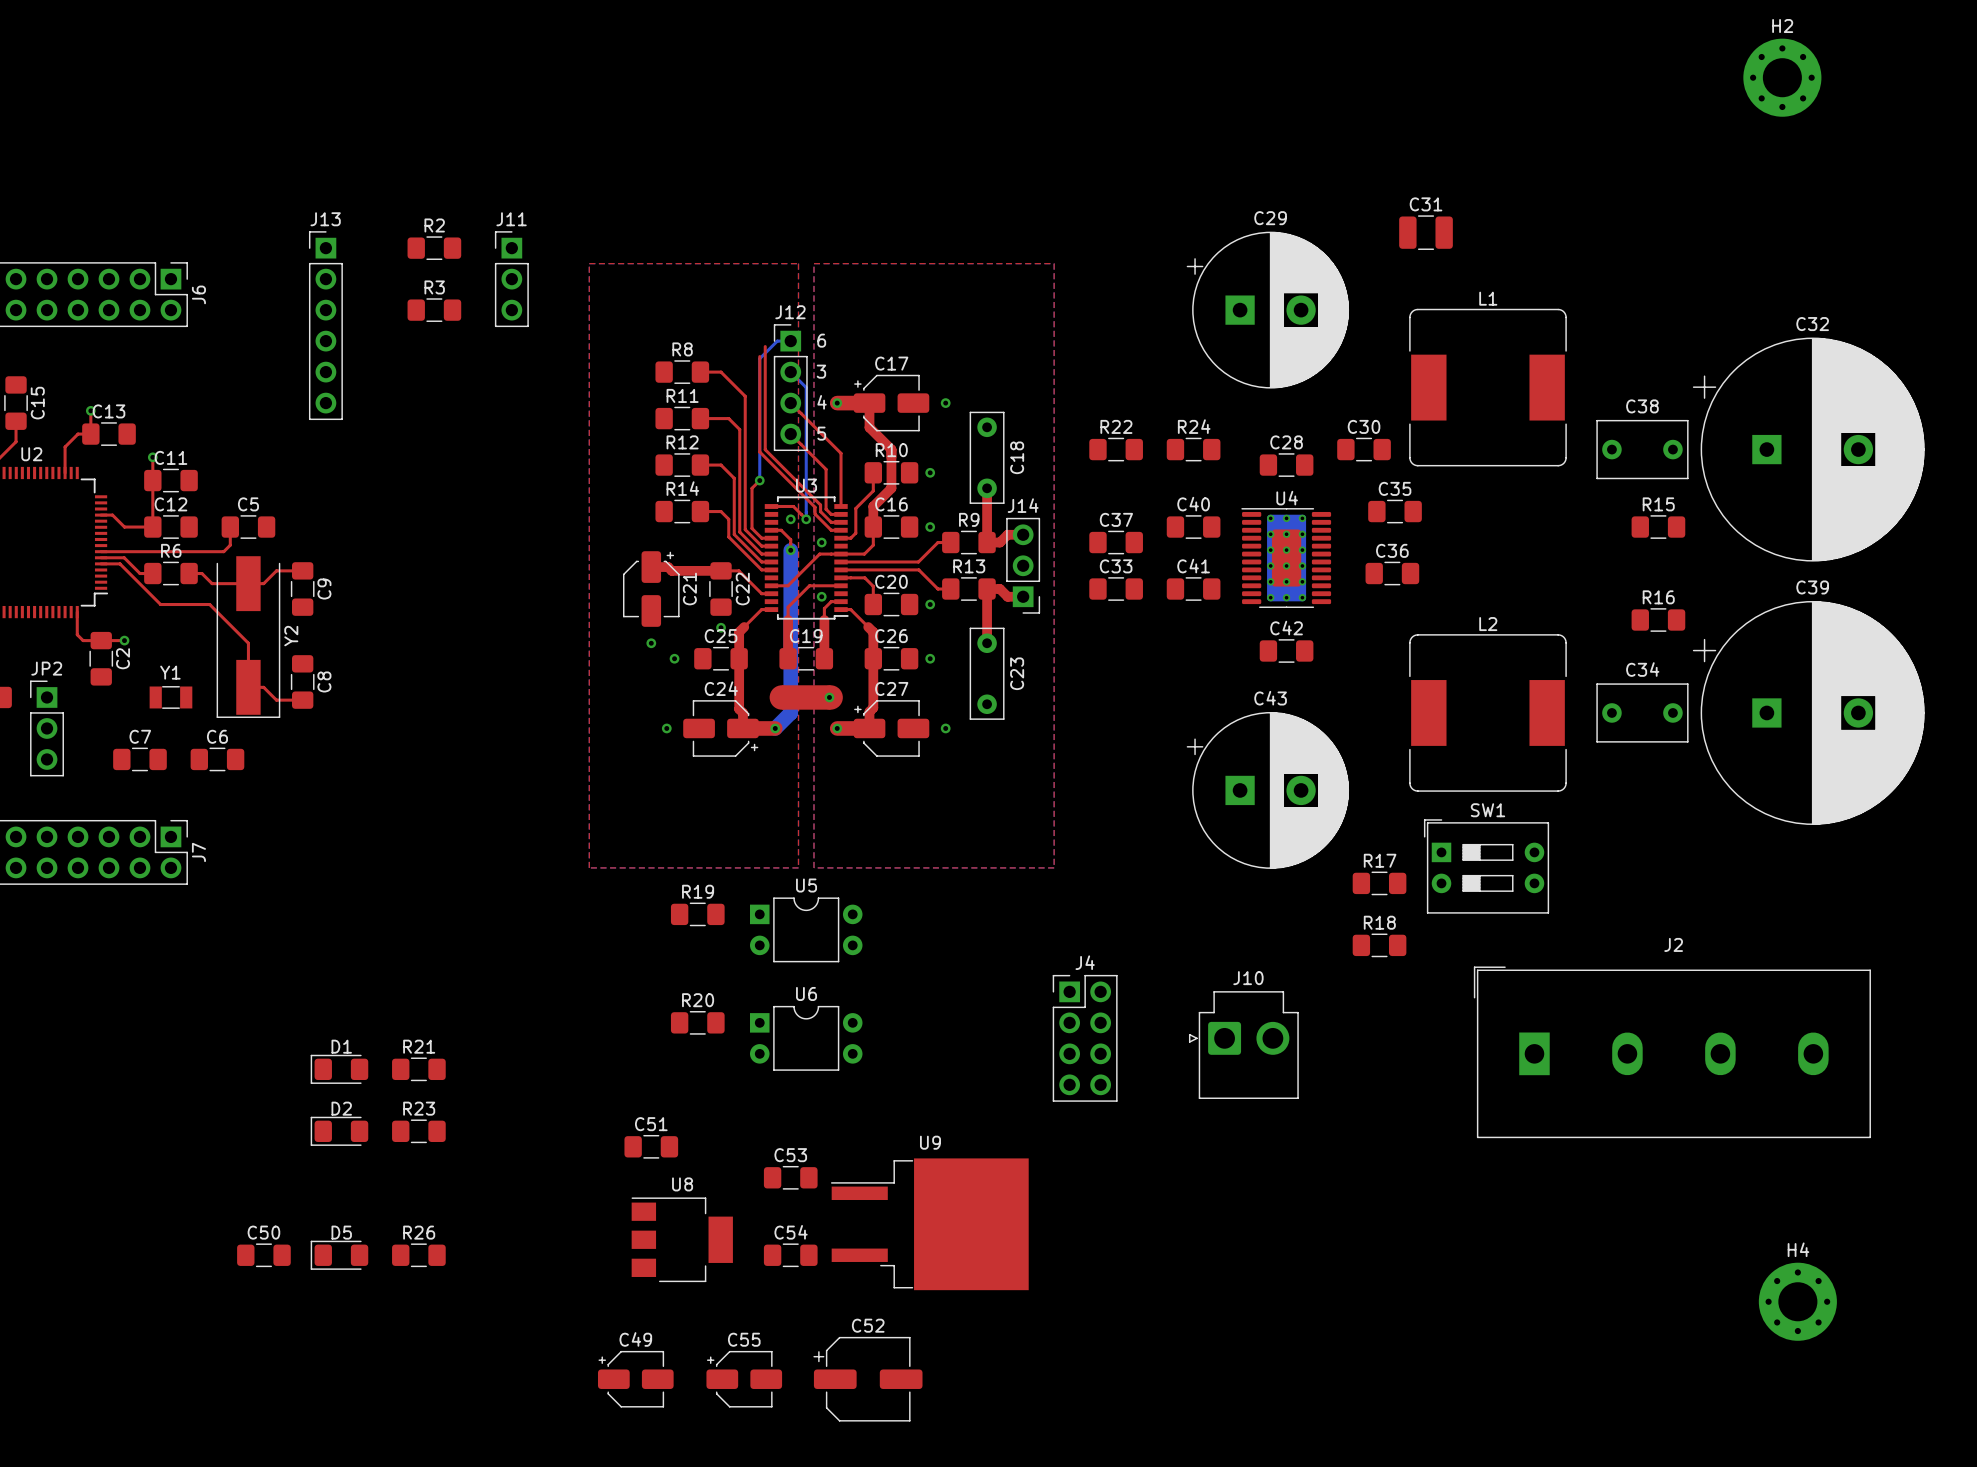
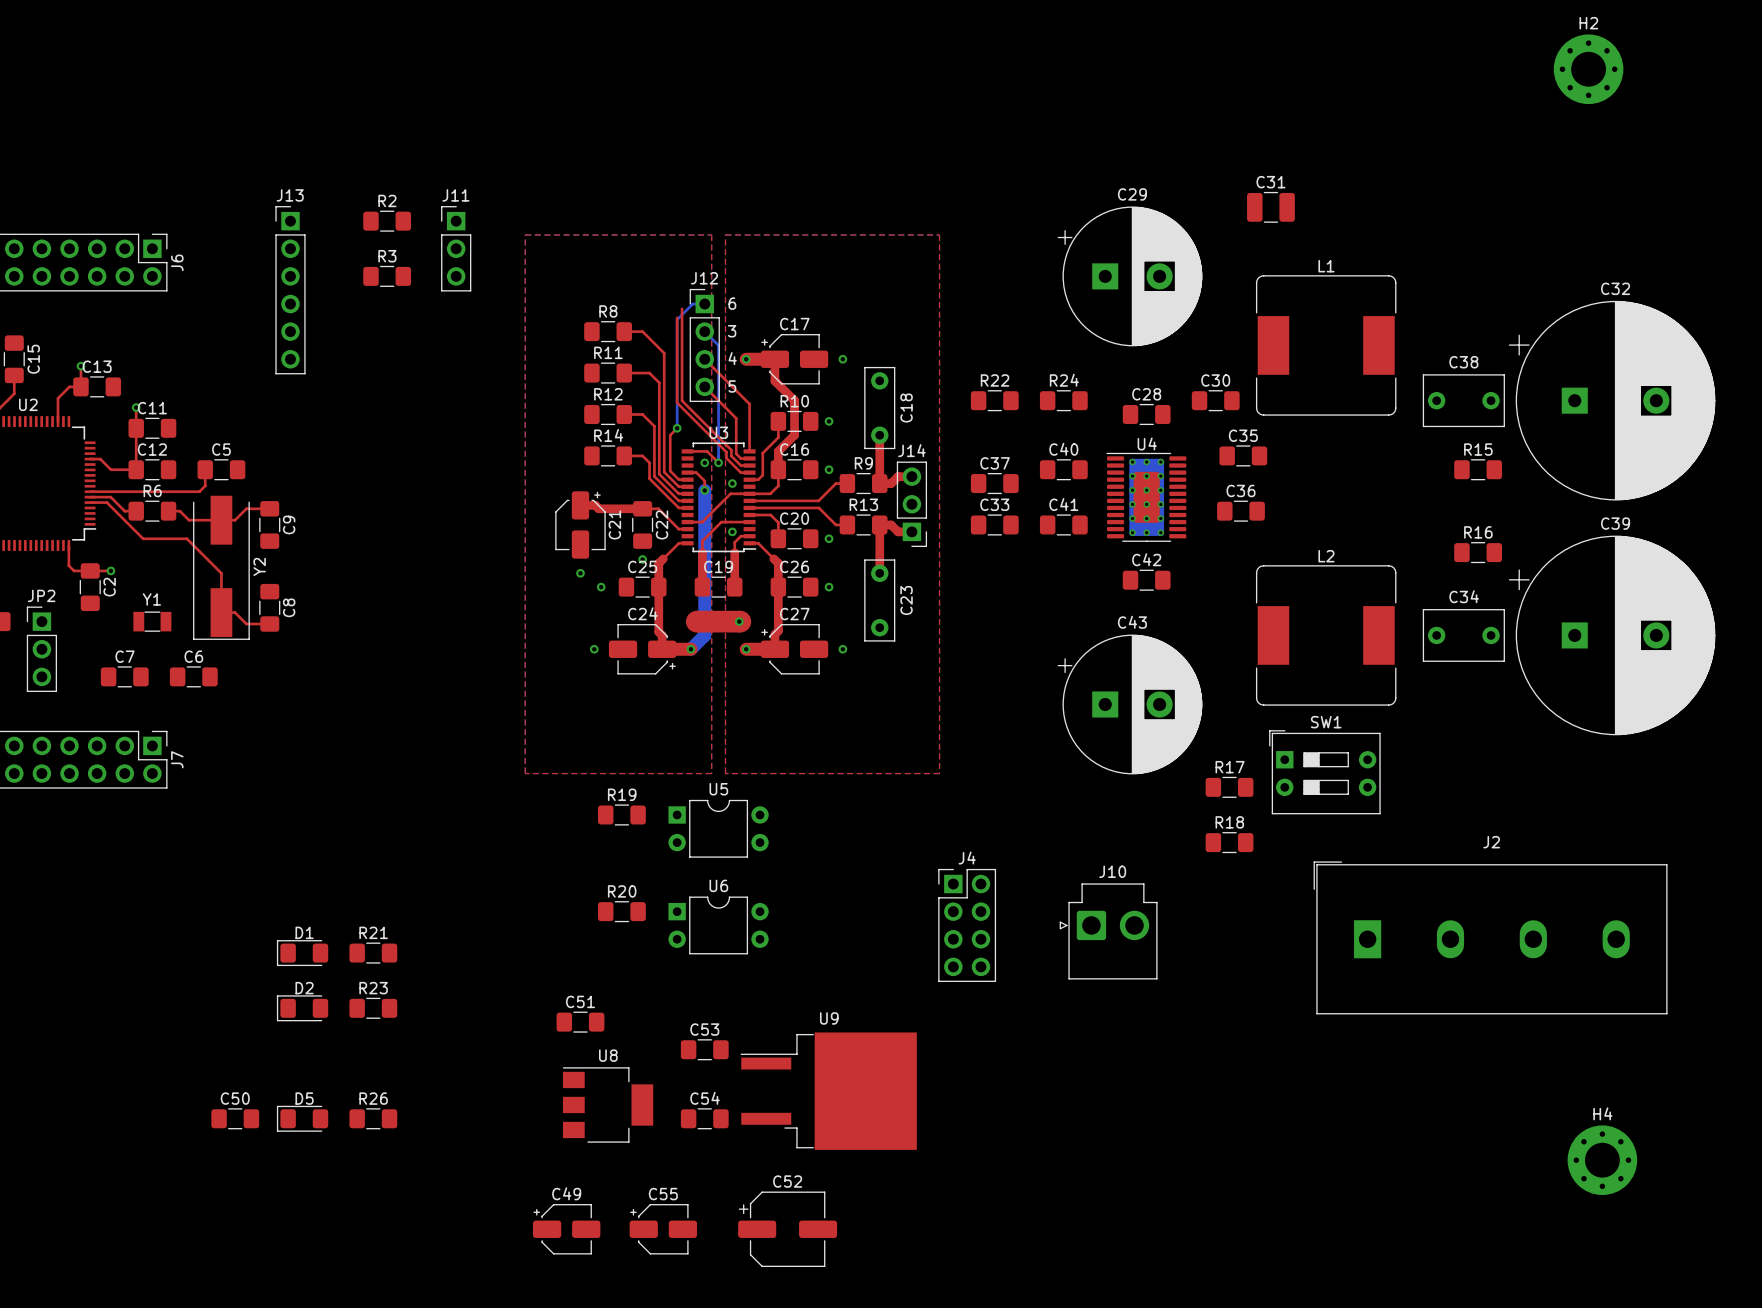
C52 footprint: [813, 1336, 923, 1422] -> [738, 1191, 838, 1267]

